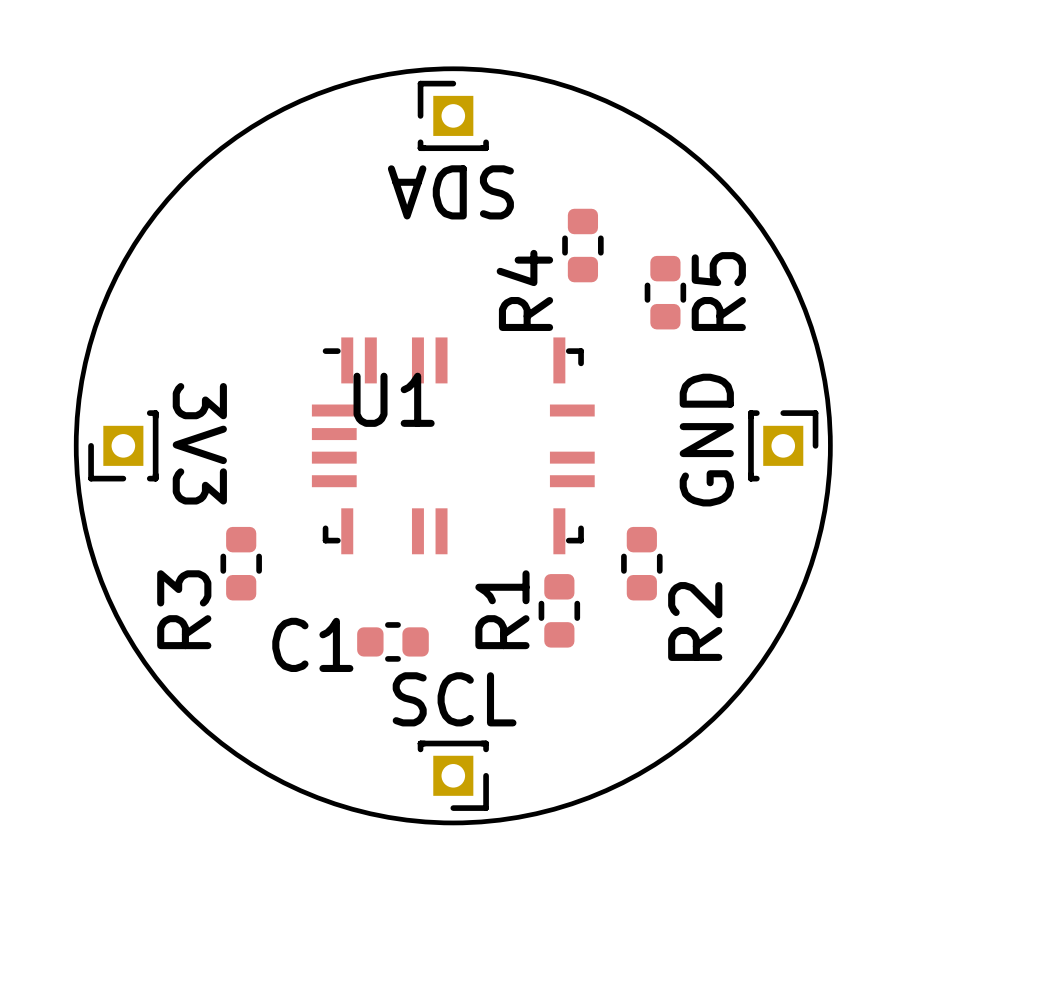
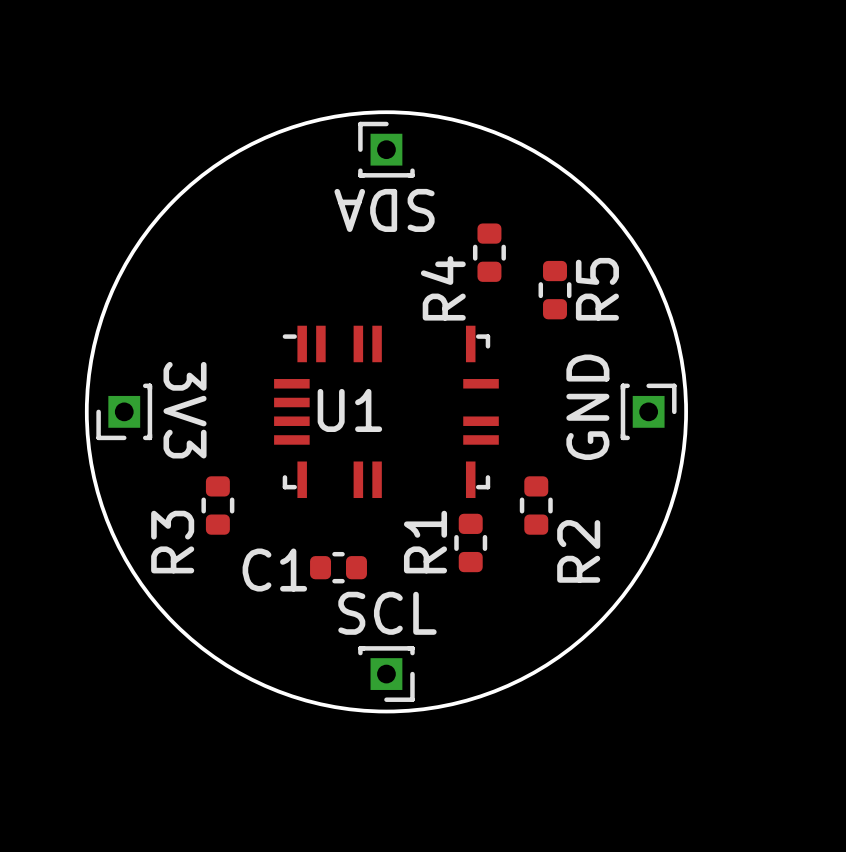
U1 name position: U1 (394, 399) -> U1 (349, 410)

